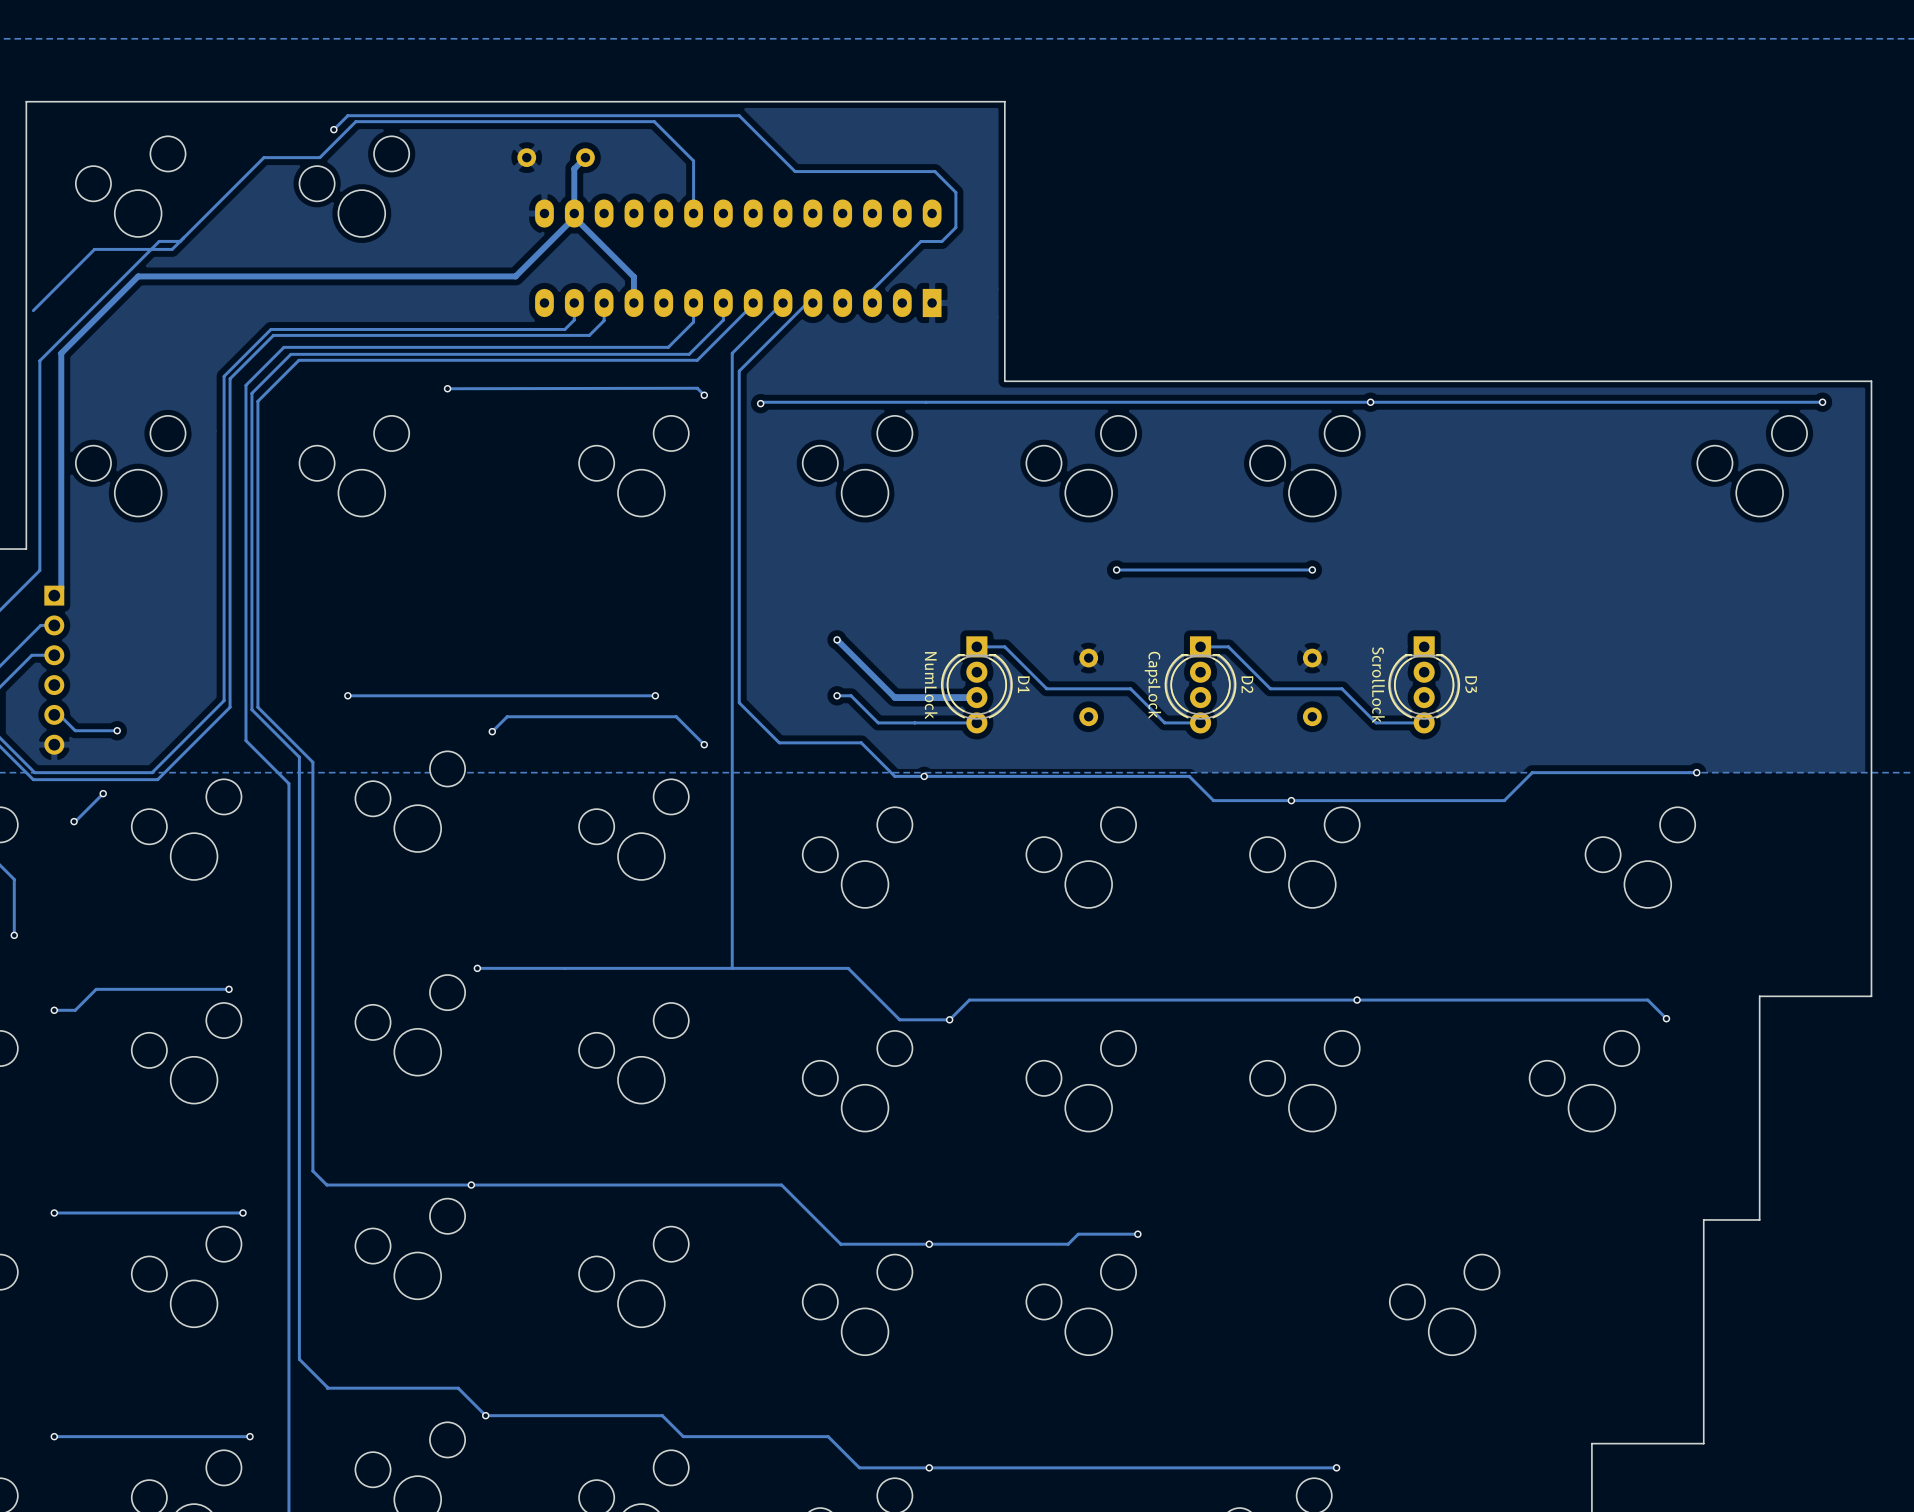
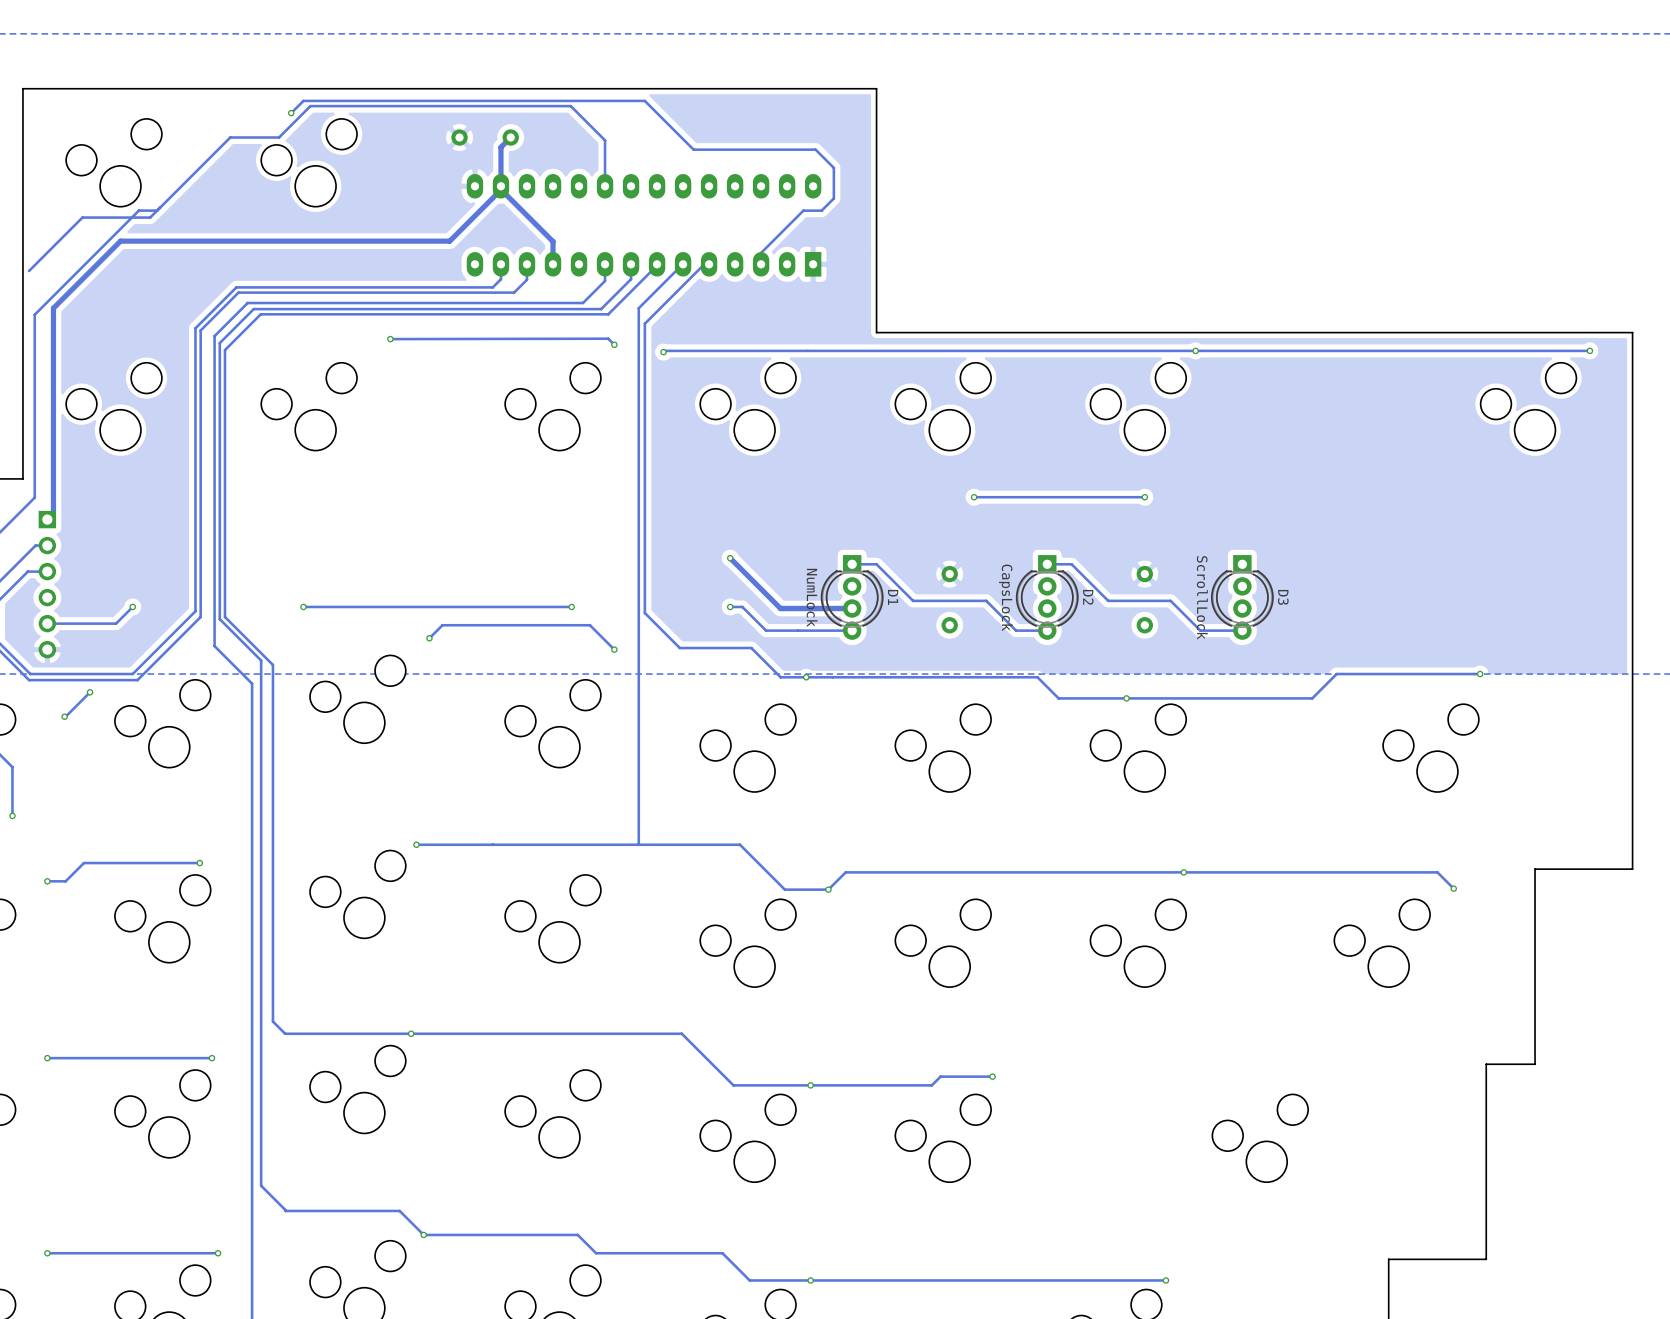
track: (59, 714) (75, 730) (117, 730) -> (51, 623) (116, 623) (132, 606)
via position: (117, 730) -> (132, 606)

